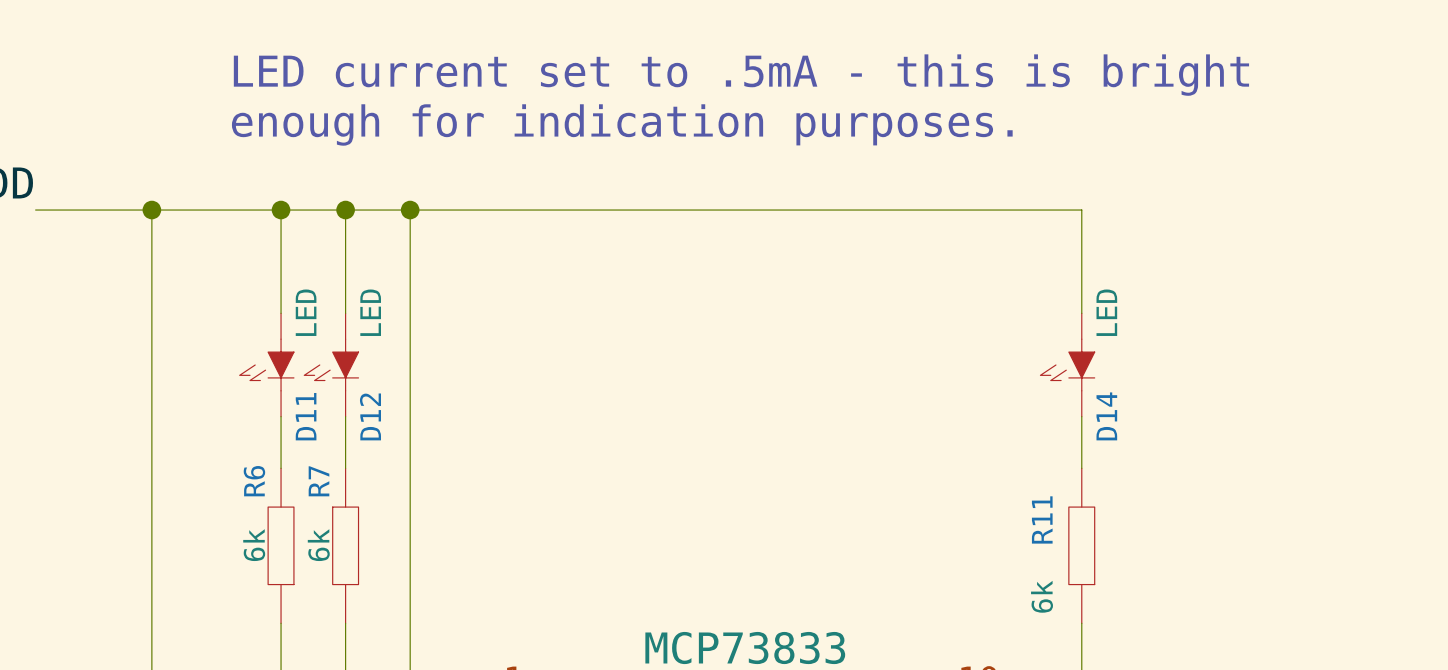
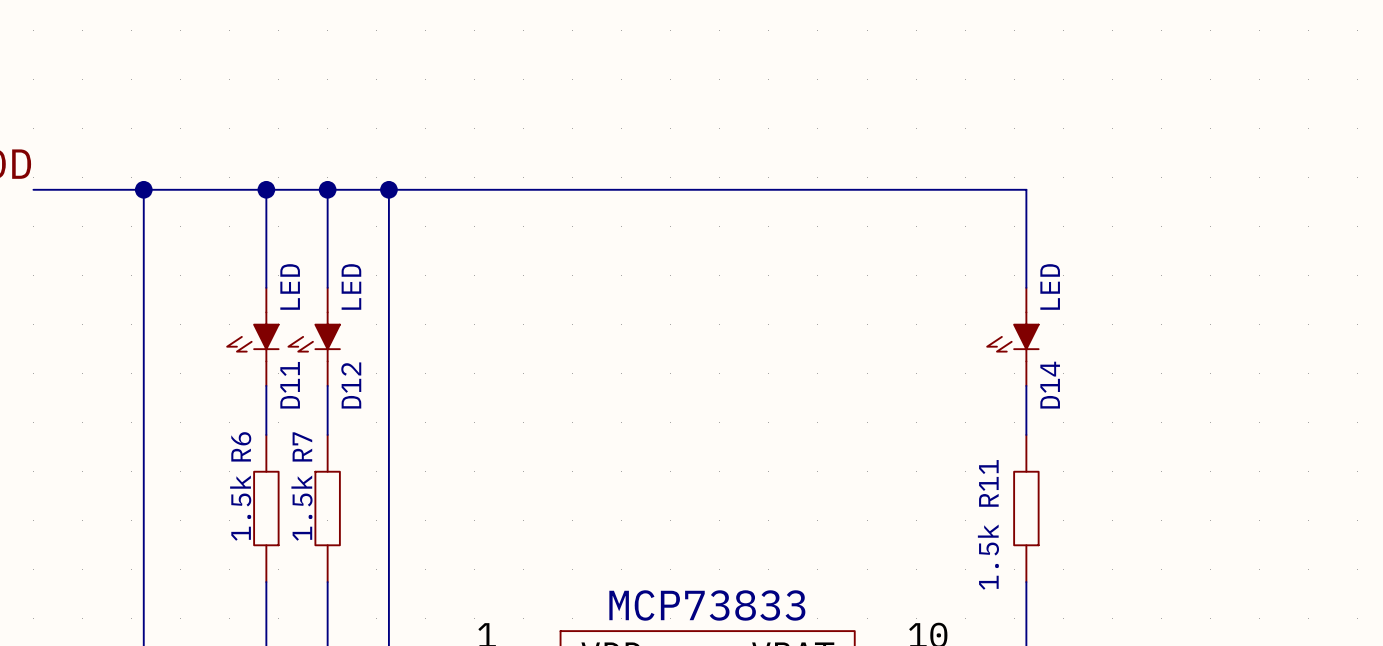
text: LED current set to .5mA - this is bright (741, 75) -> none
text: enough for indication purposes. (622, 124) -> none
R6 value: 6k (254, 545) -> 1.5k (240, 508)
R7 value: 6k (318, 545) -> 1.5k (301, 508)
R11 value: 6k (1042, 596) -> 1.5k (988, 557)

